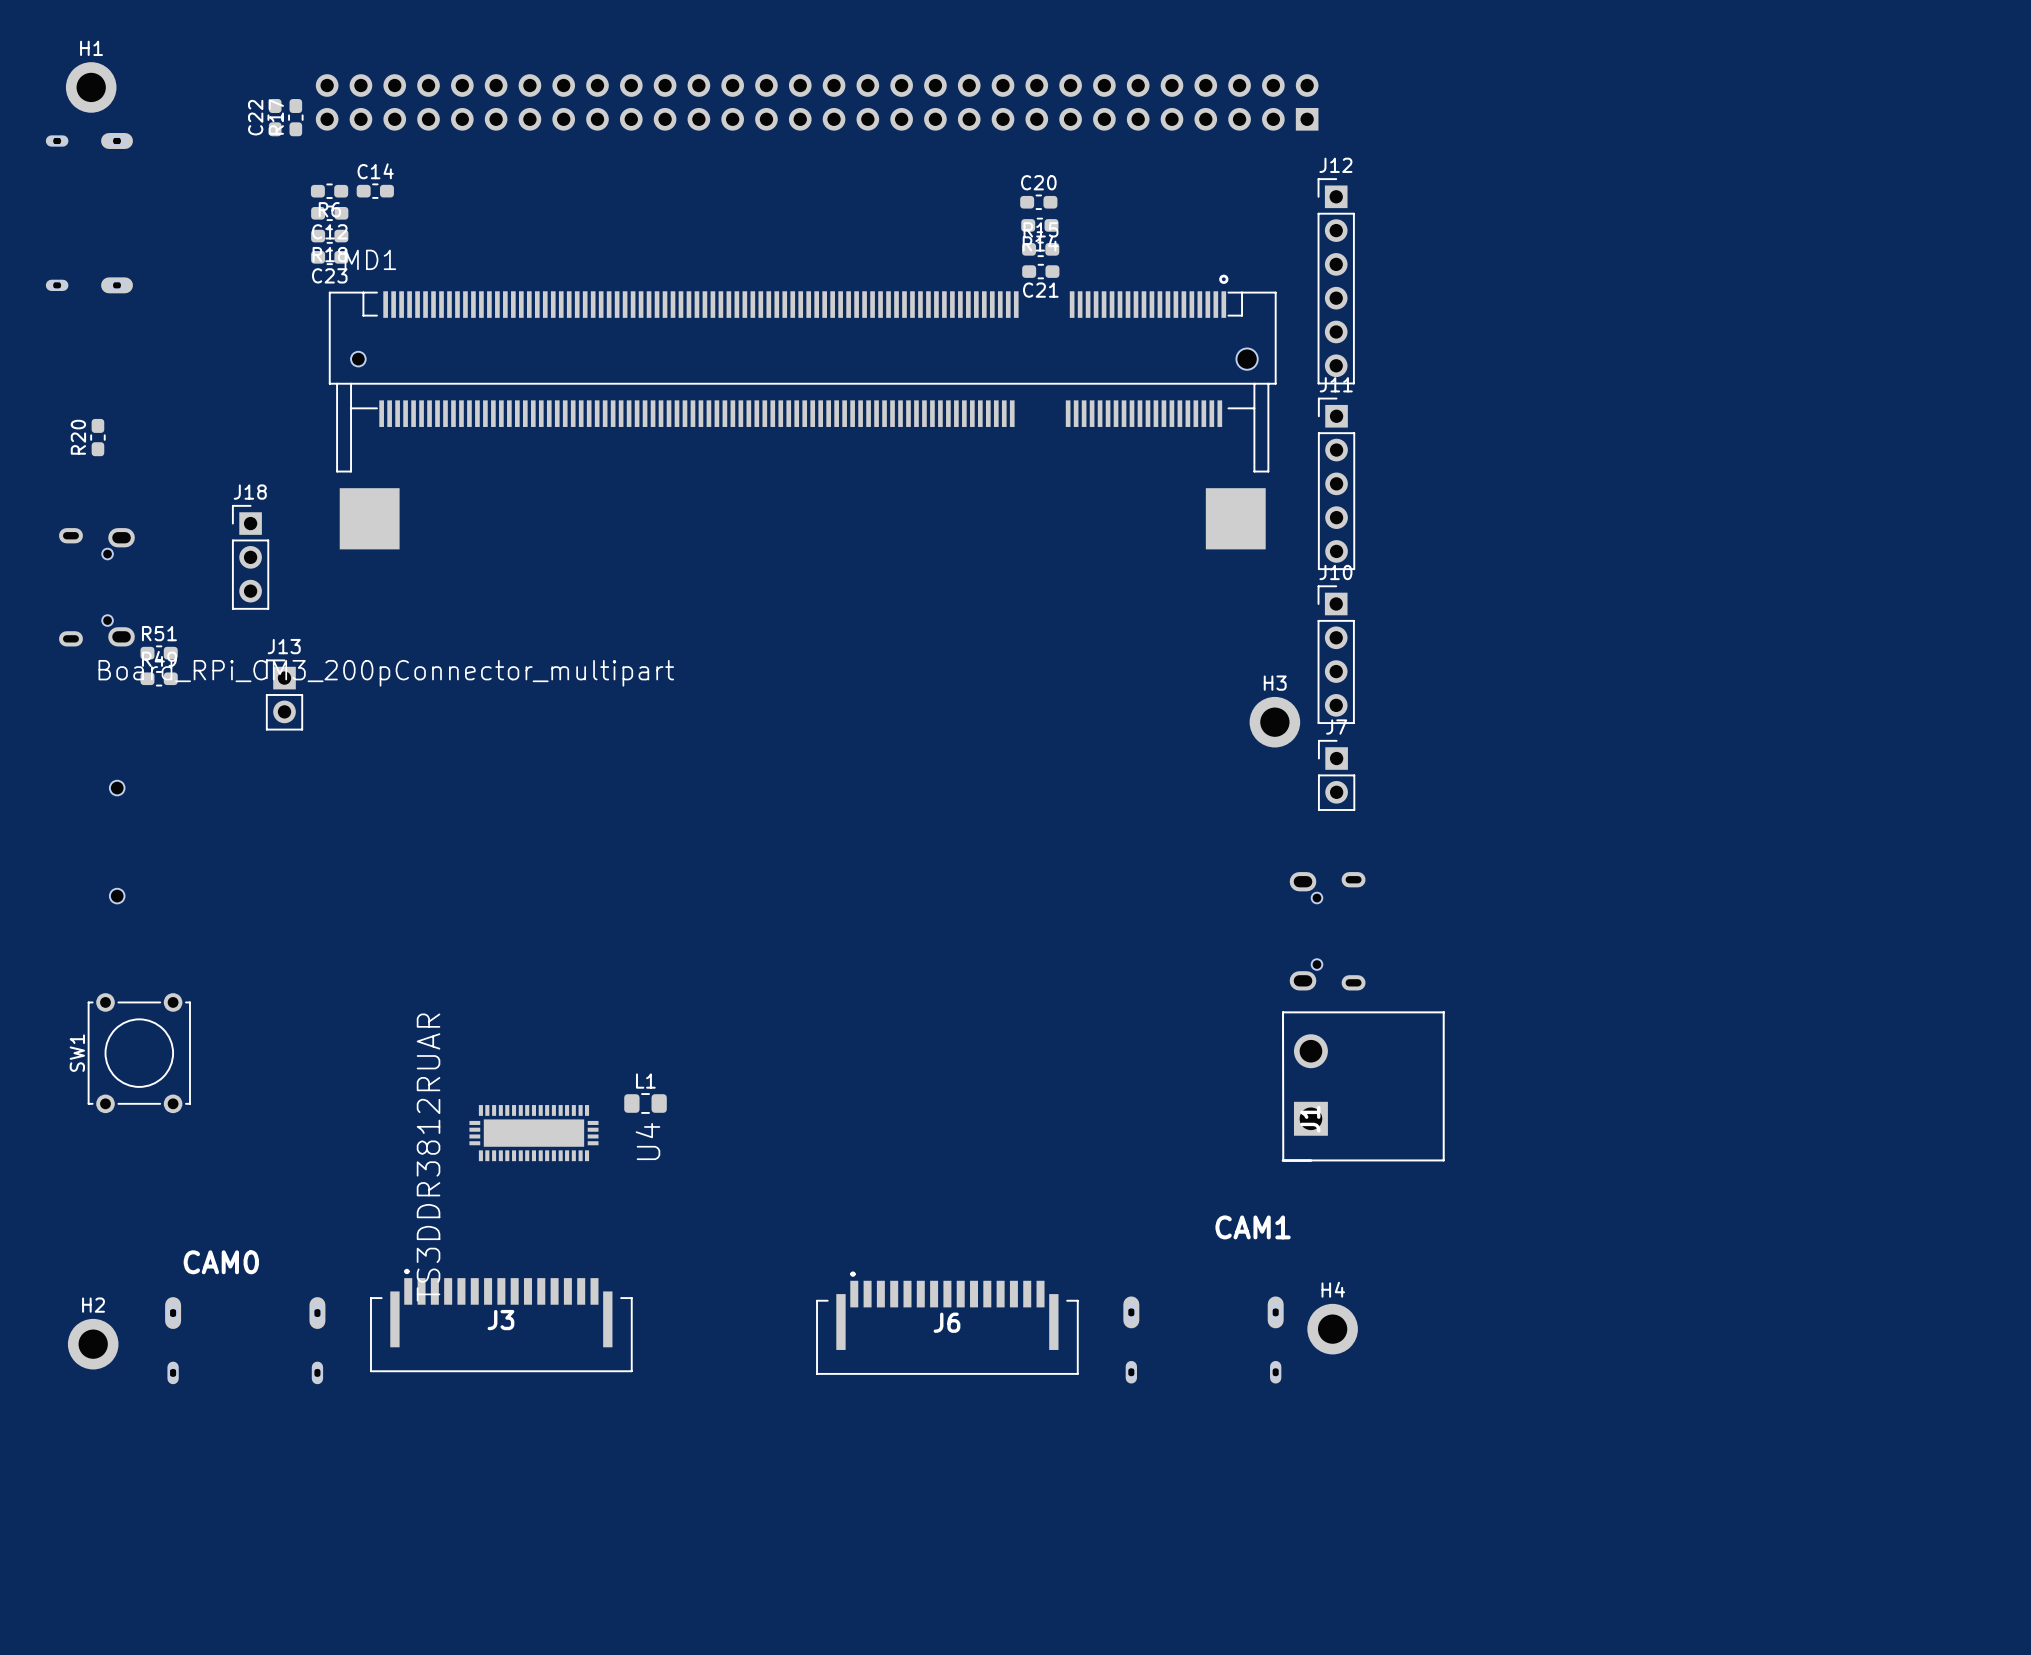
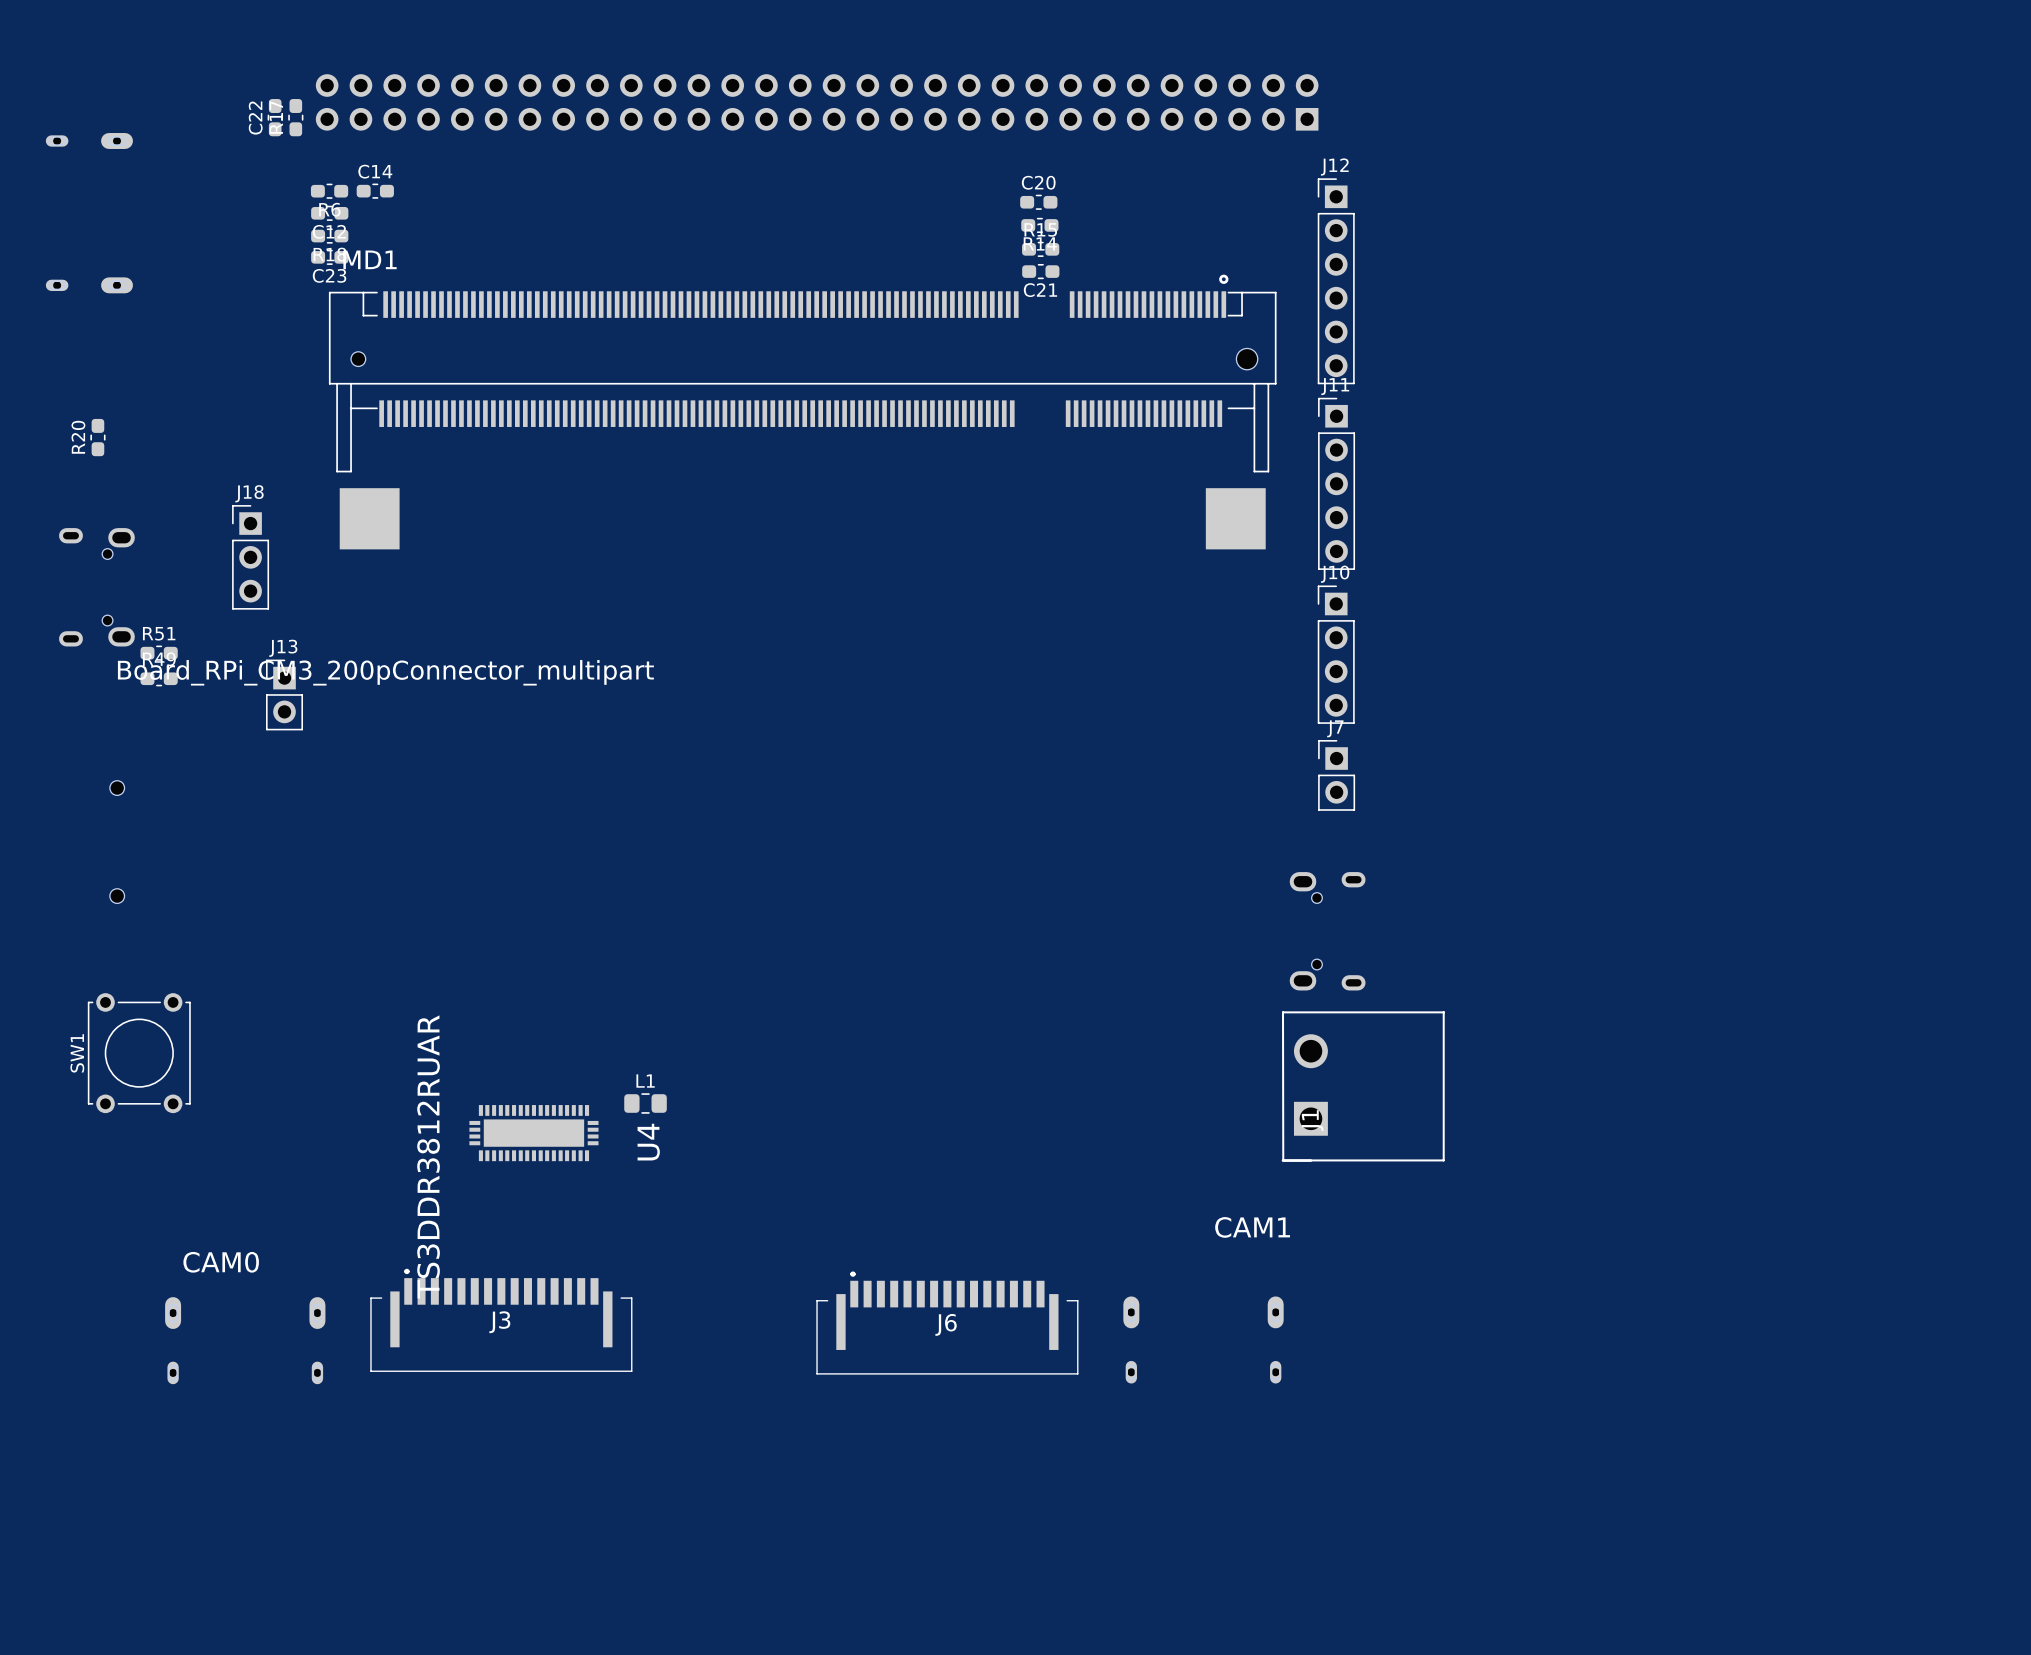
H1: (91, 87) -> none
H3: (1274, 722) -> none
H4: (1332, 1329) -> none
H2: (93, 1344) -> none

